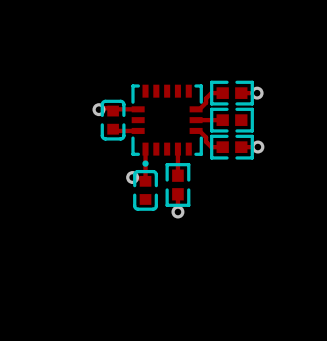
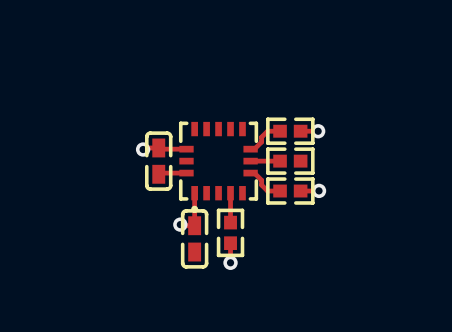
part footprint: [100, 99, 126, 141] -> [145, 131, 173, 191]
part footprint: [133, 169, 158, 211] -> [180, 209, 209, 269]

